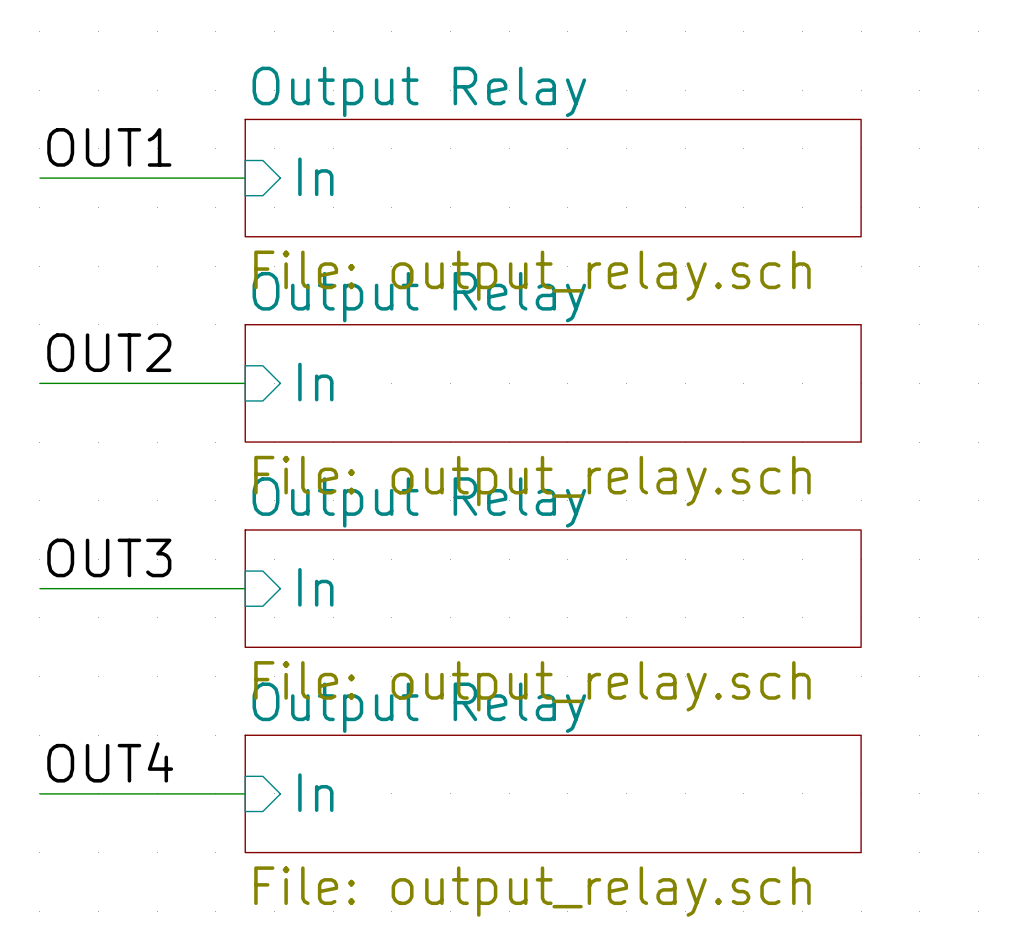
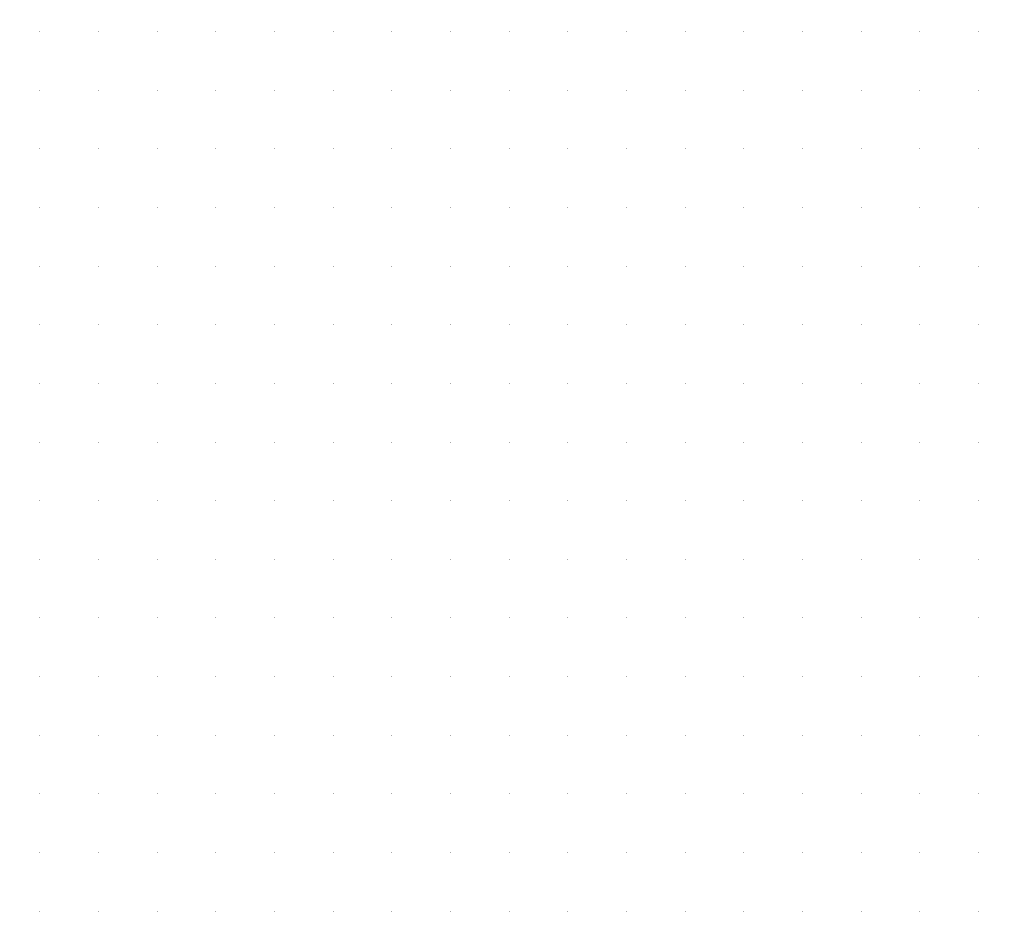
label: OUT1 (109, 147) -> none
sheet pin: In (315, 176) -> none
wire: (39, 178) (245, 178) -> none
sheet Output Relay: File: output_relay.sch (553, 178) -> none
label: OUT2 (109, 352) -> none
sheet pin: In (315, 382) -> none
wire: (39, 383) (245, 383) -> none
sheet Output Relay: File: output_relay.sch (553, 383) -> none
label: OUT3 (109, 557) -> none
sheet pin: In (315, 587) -> none
wire: (39, 588) (245, 588) -> none
sheet Output Relay: File: output_relay.sch (553, 588) -> none
label: OUT4 (110, 762) -> none
sheet pin: In (315, 792) -> none
wire: (39, 793) (245, 793) -> none
sheet Output Relay: File: output_relay.sch (553, 793) -> none

